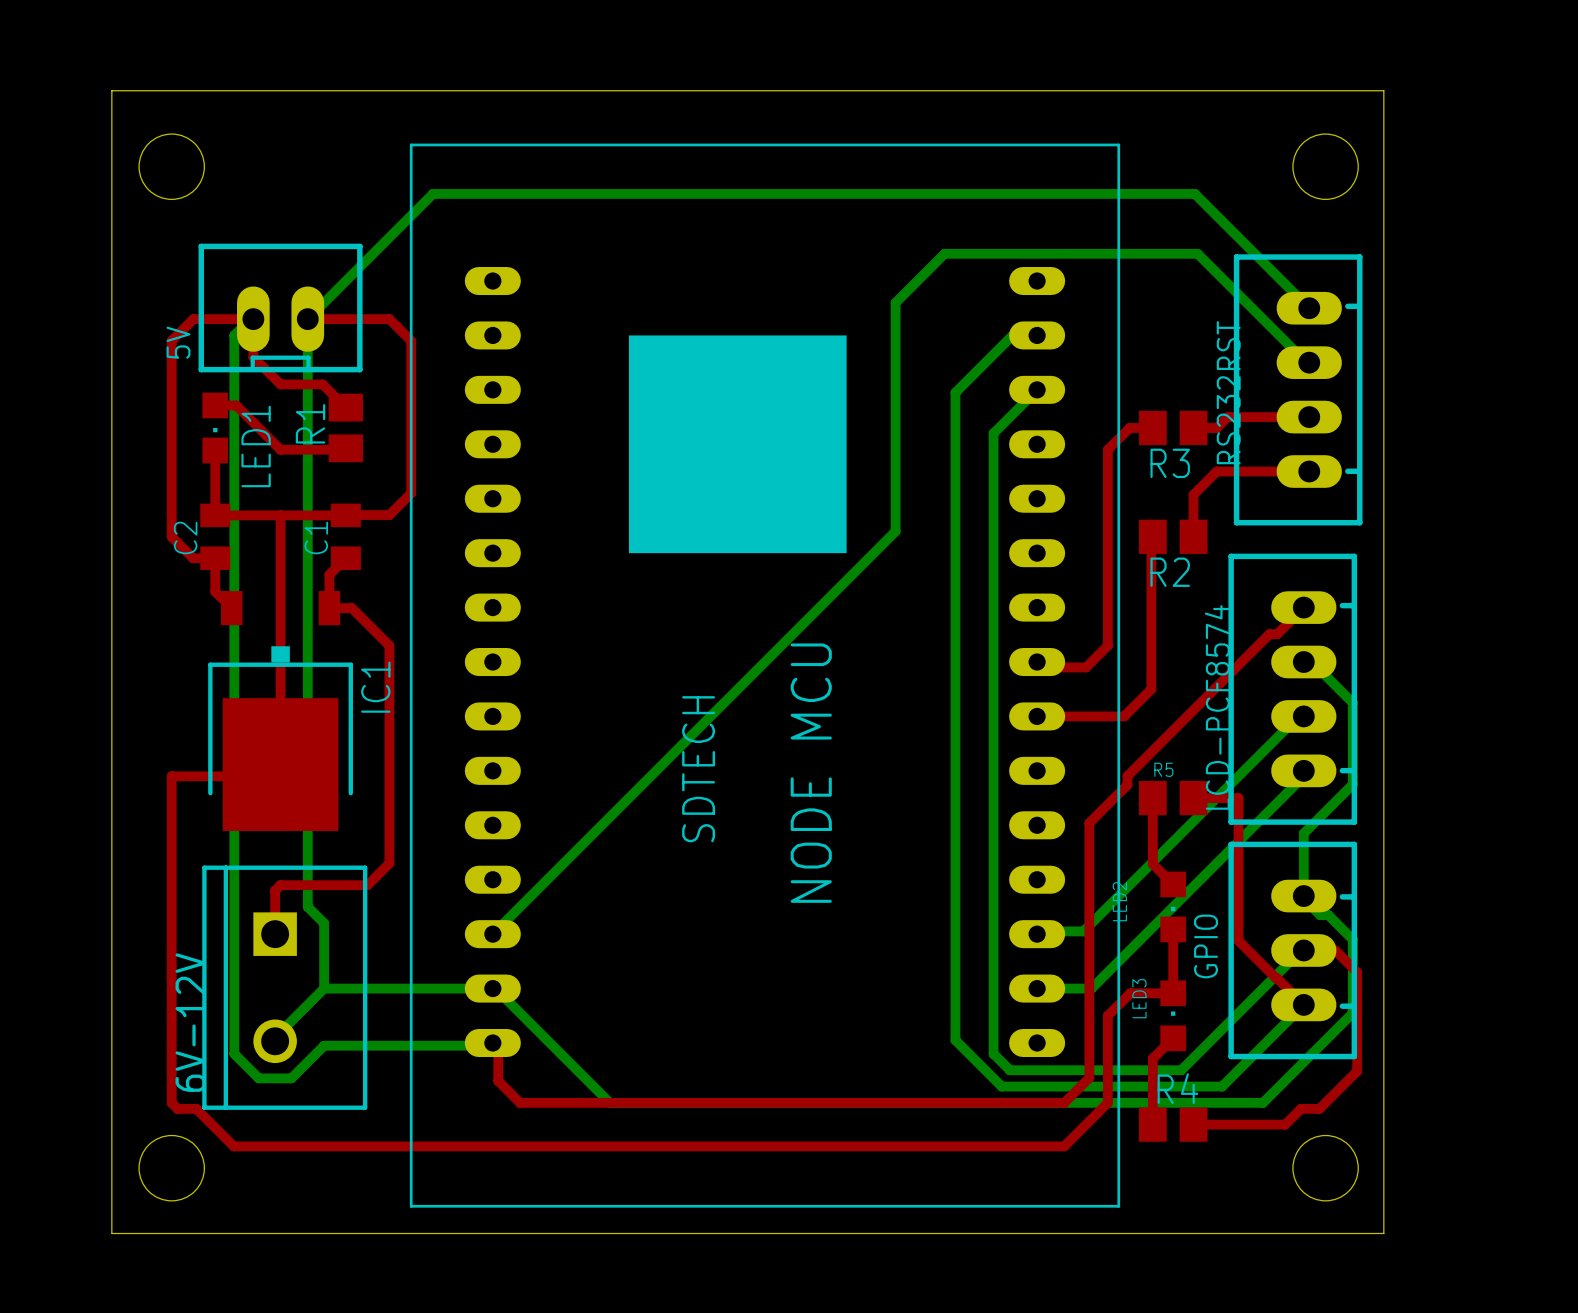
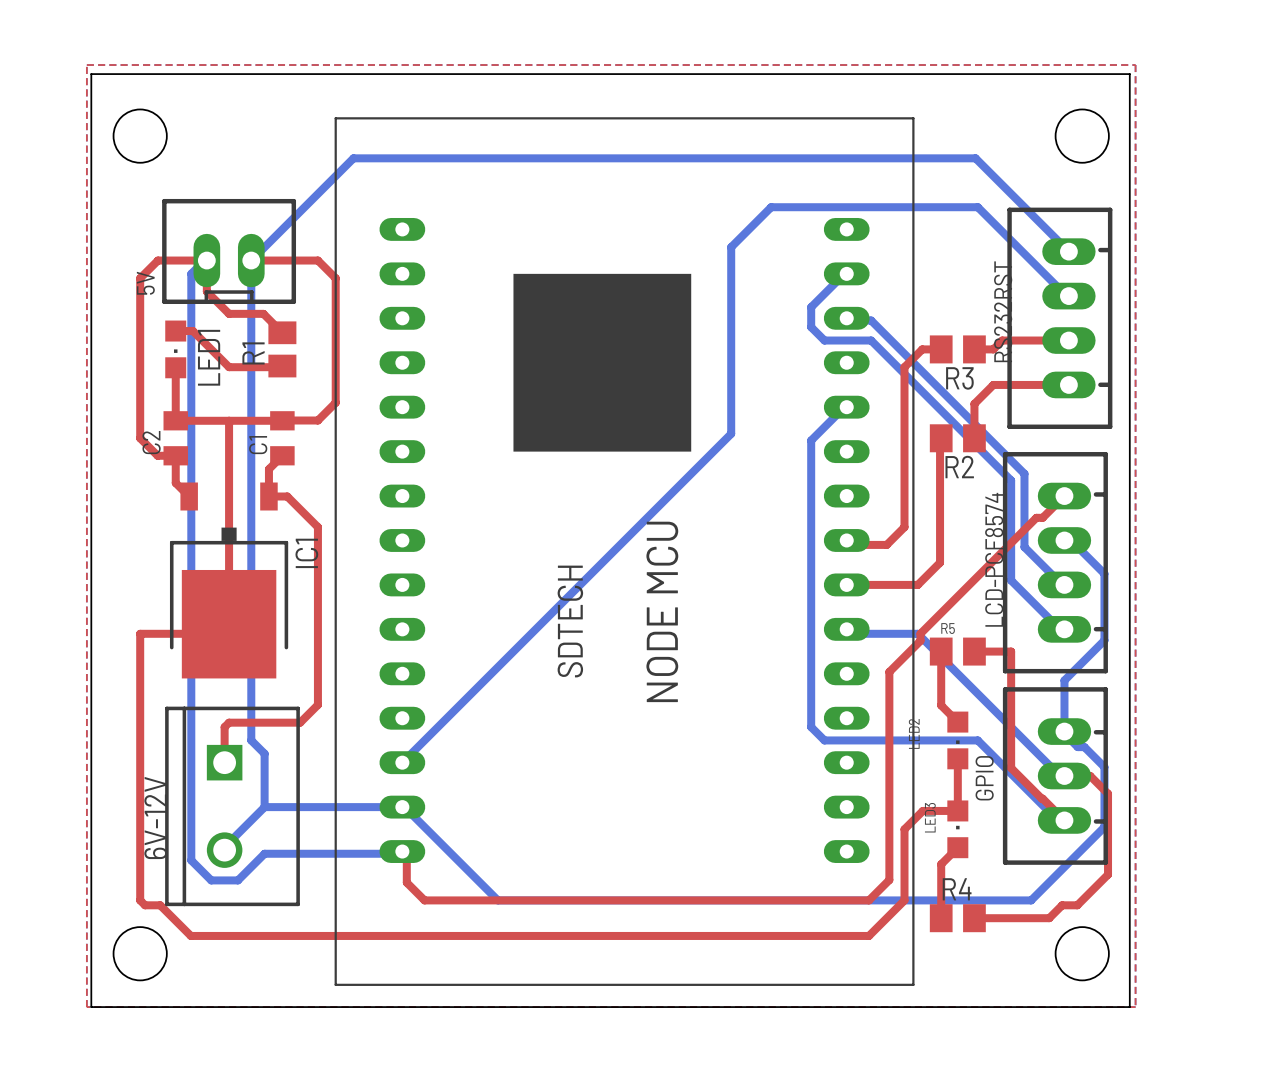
top zone outline: none -> (86, 65) (1135, 65) (1135, 1007) (86, 1007) (86, 65)
bottom track: (1034, 335) (1012, 335) (955, 392) (955, 1040) (1001, 1086) (1222, 1086) (1303, 1004) -> (844, 273) (811, 307) (811, 327) (824, 340) (871, 340) (1011, 480) (1011, 580) (1064, 633)
bottom track: (1037, 389) (993, 433) (993, 539) -> (846, 407) (844, 407) (811, 440)
bottom track: (1303, 716) (1303, 710) (1083, 931) (1042, 931) (1037, 934) -> (1064, 584) (1064, 587) (1024, 547) (1024, 473) (871, 320) (851, 320) (846, 318)
bottom track: none -> (846, 629) (851, 633) (917, 633) (1064, 780) (1064, 775)
bottom track: (1303, 776) (1091, 988) (1037, 988) -> none
bottom track: (993, 890) (993, 1053) (1009, 1070) (1181, 1070) (1303, 947) (1303, 950) -> (811, 727) (824, 740) (977, 740) (1057, 820) (1064, 820)

